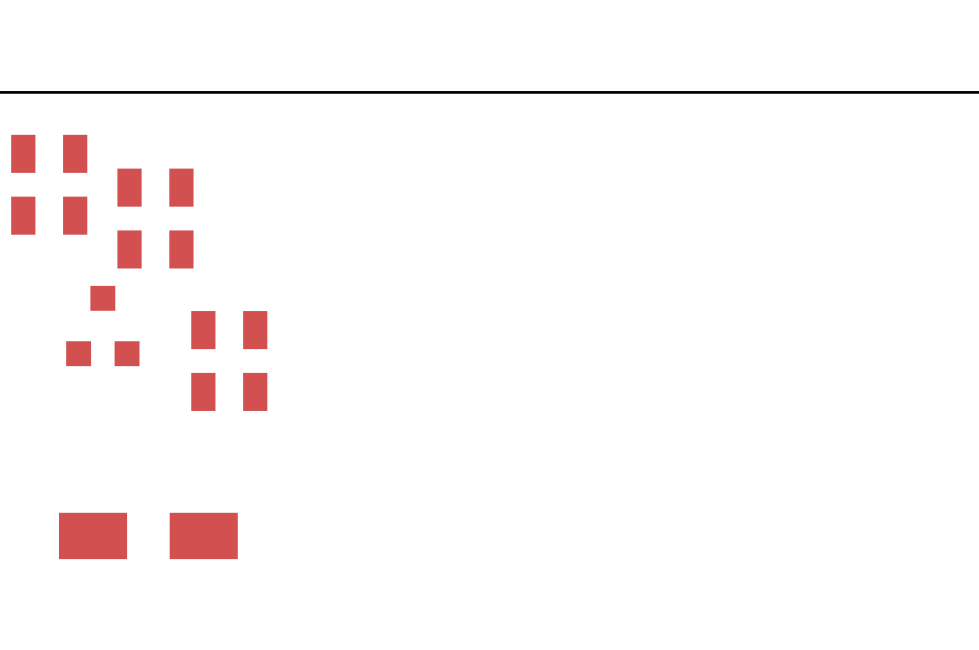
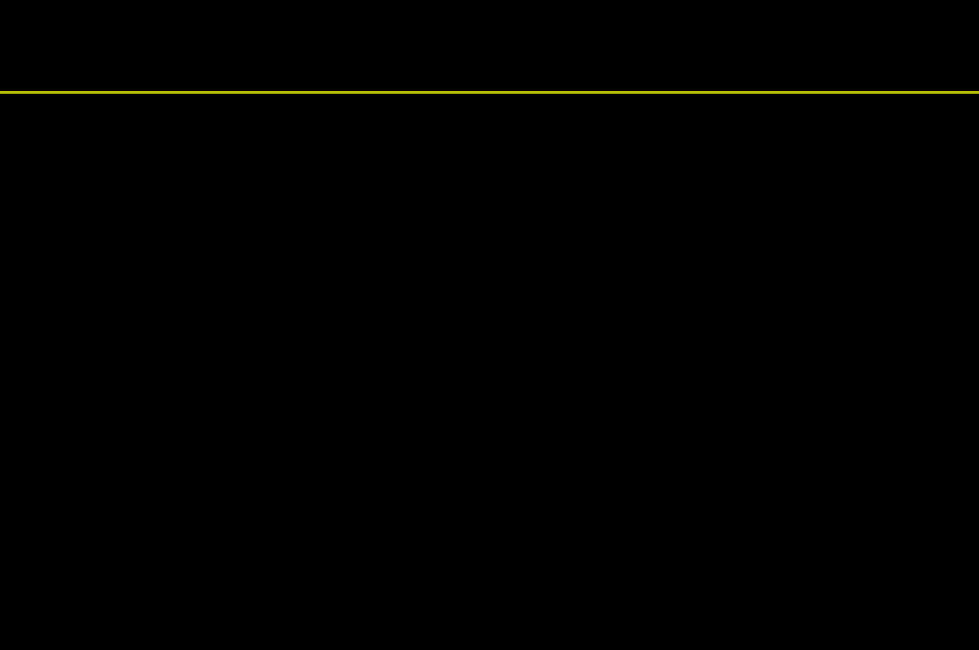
part: (49, 153) -> none
part: (155, 187) -> none
part: (49, 215) -> none
part: (155, 249) -> none
part: (102, 326) -> none
part: (229, 330) -> none
part: (229, 391) -> none
part: (148, 535) -> none

